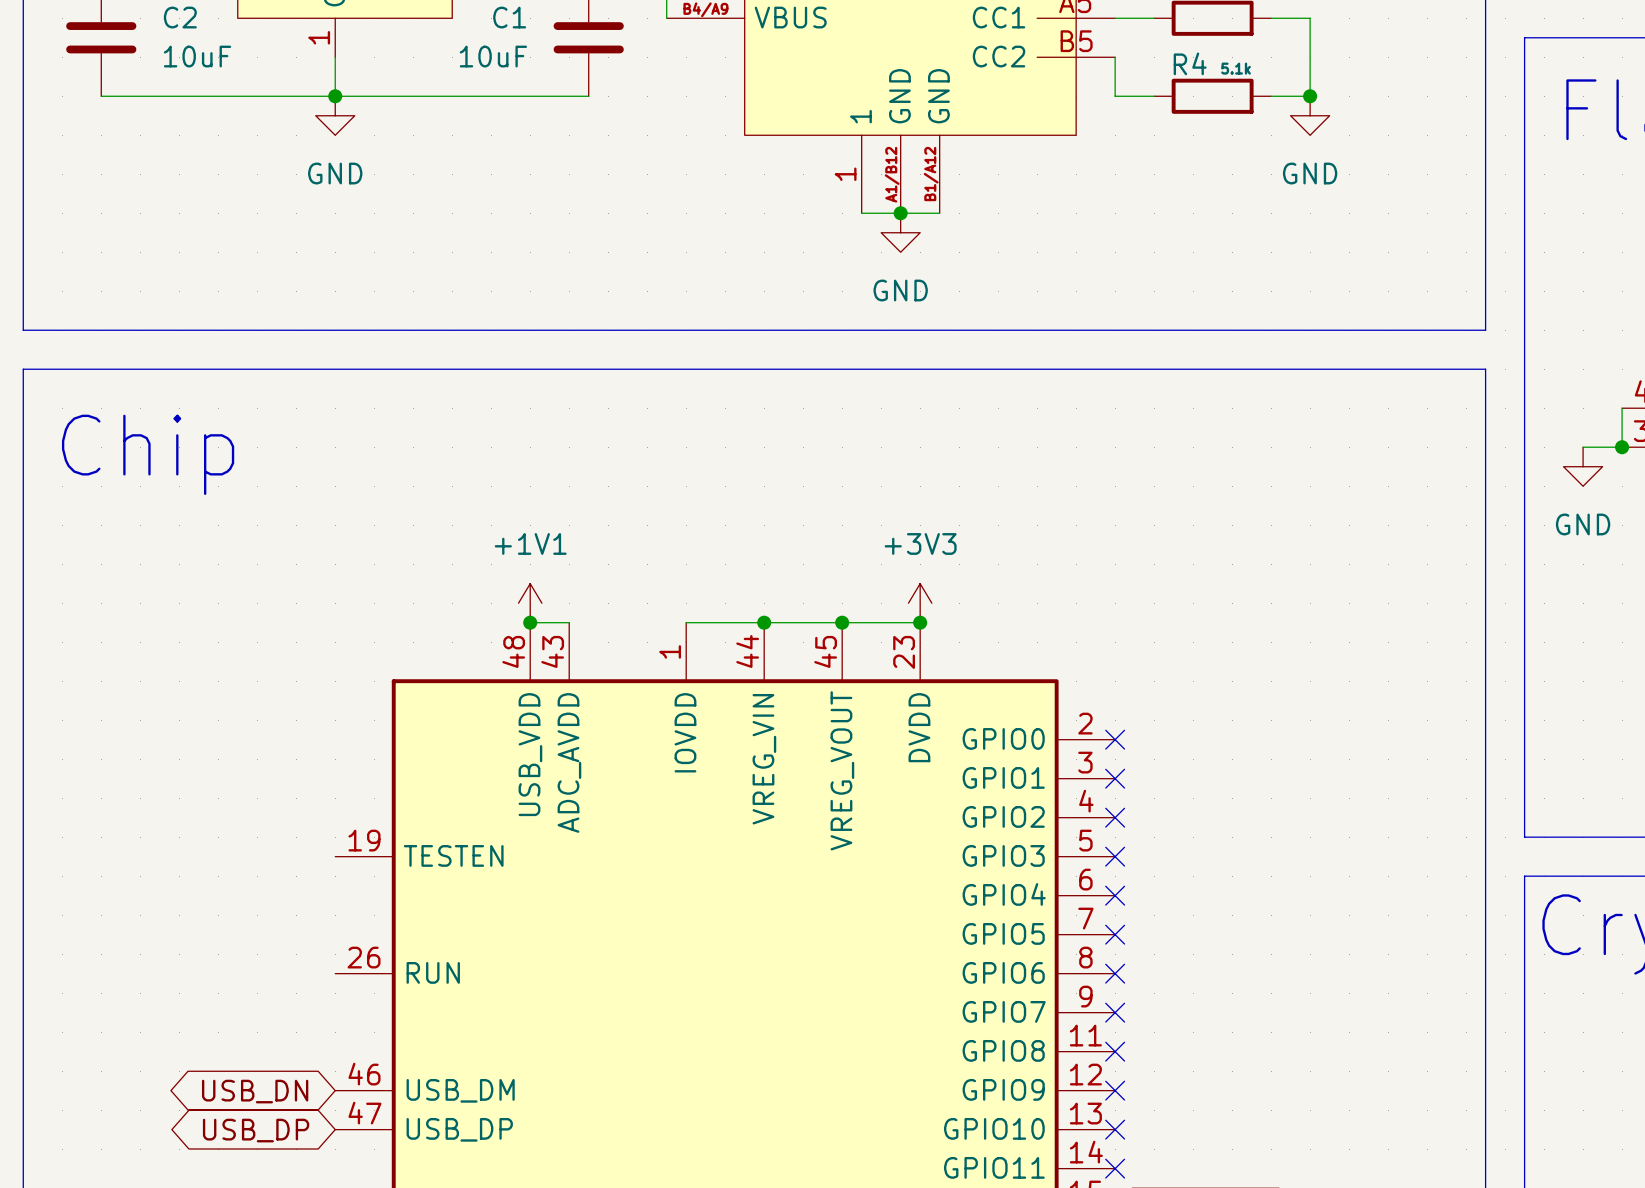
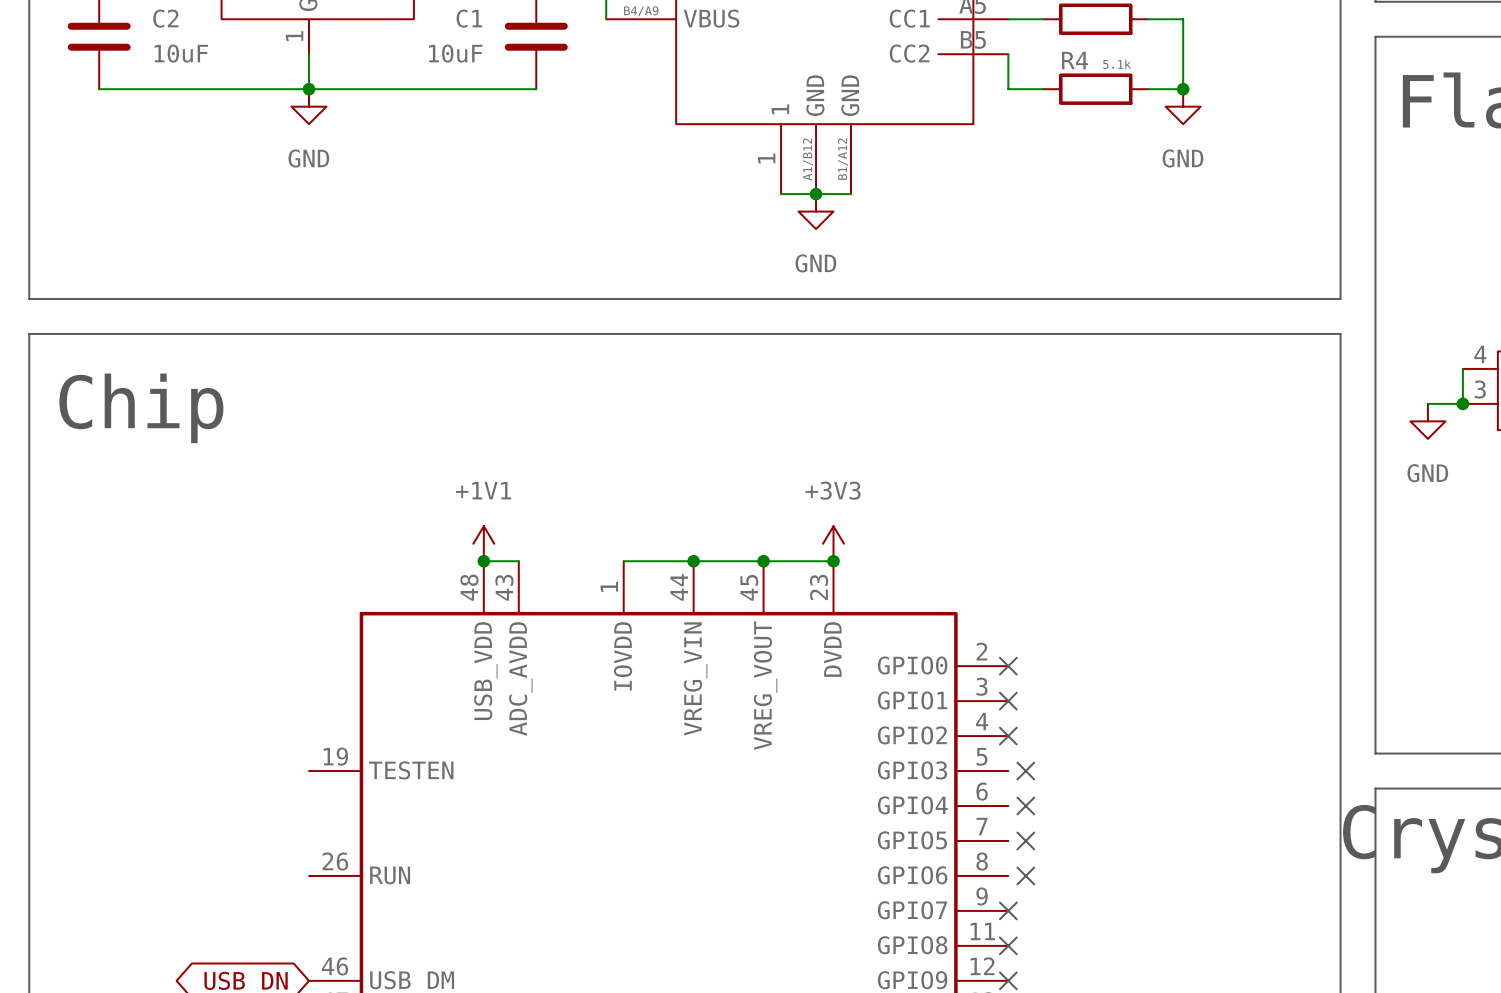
no-connect mark position: (1115, 856) -> (1025, 771)
no-connect mark position: (1115, 895) -> (1025, 806)
no-connect mark position: (1115, 934) -> (1025, 840)
no-connect mark position: (1115, 973) -> (1025, 875)

